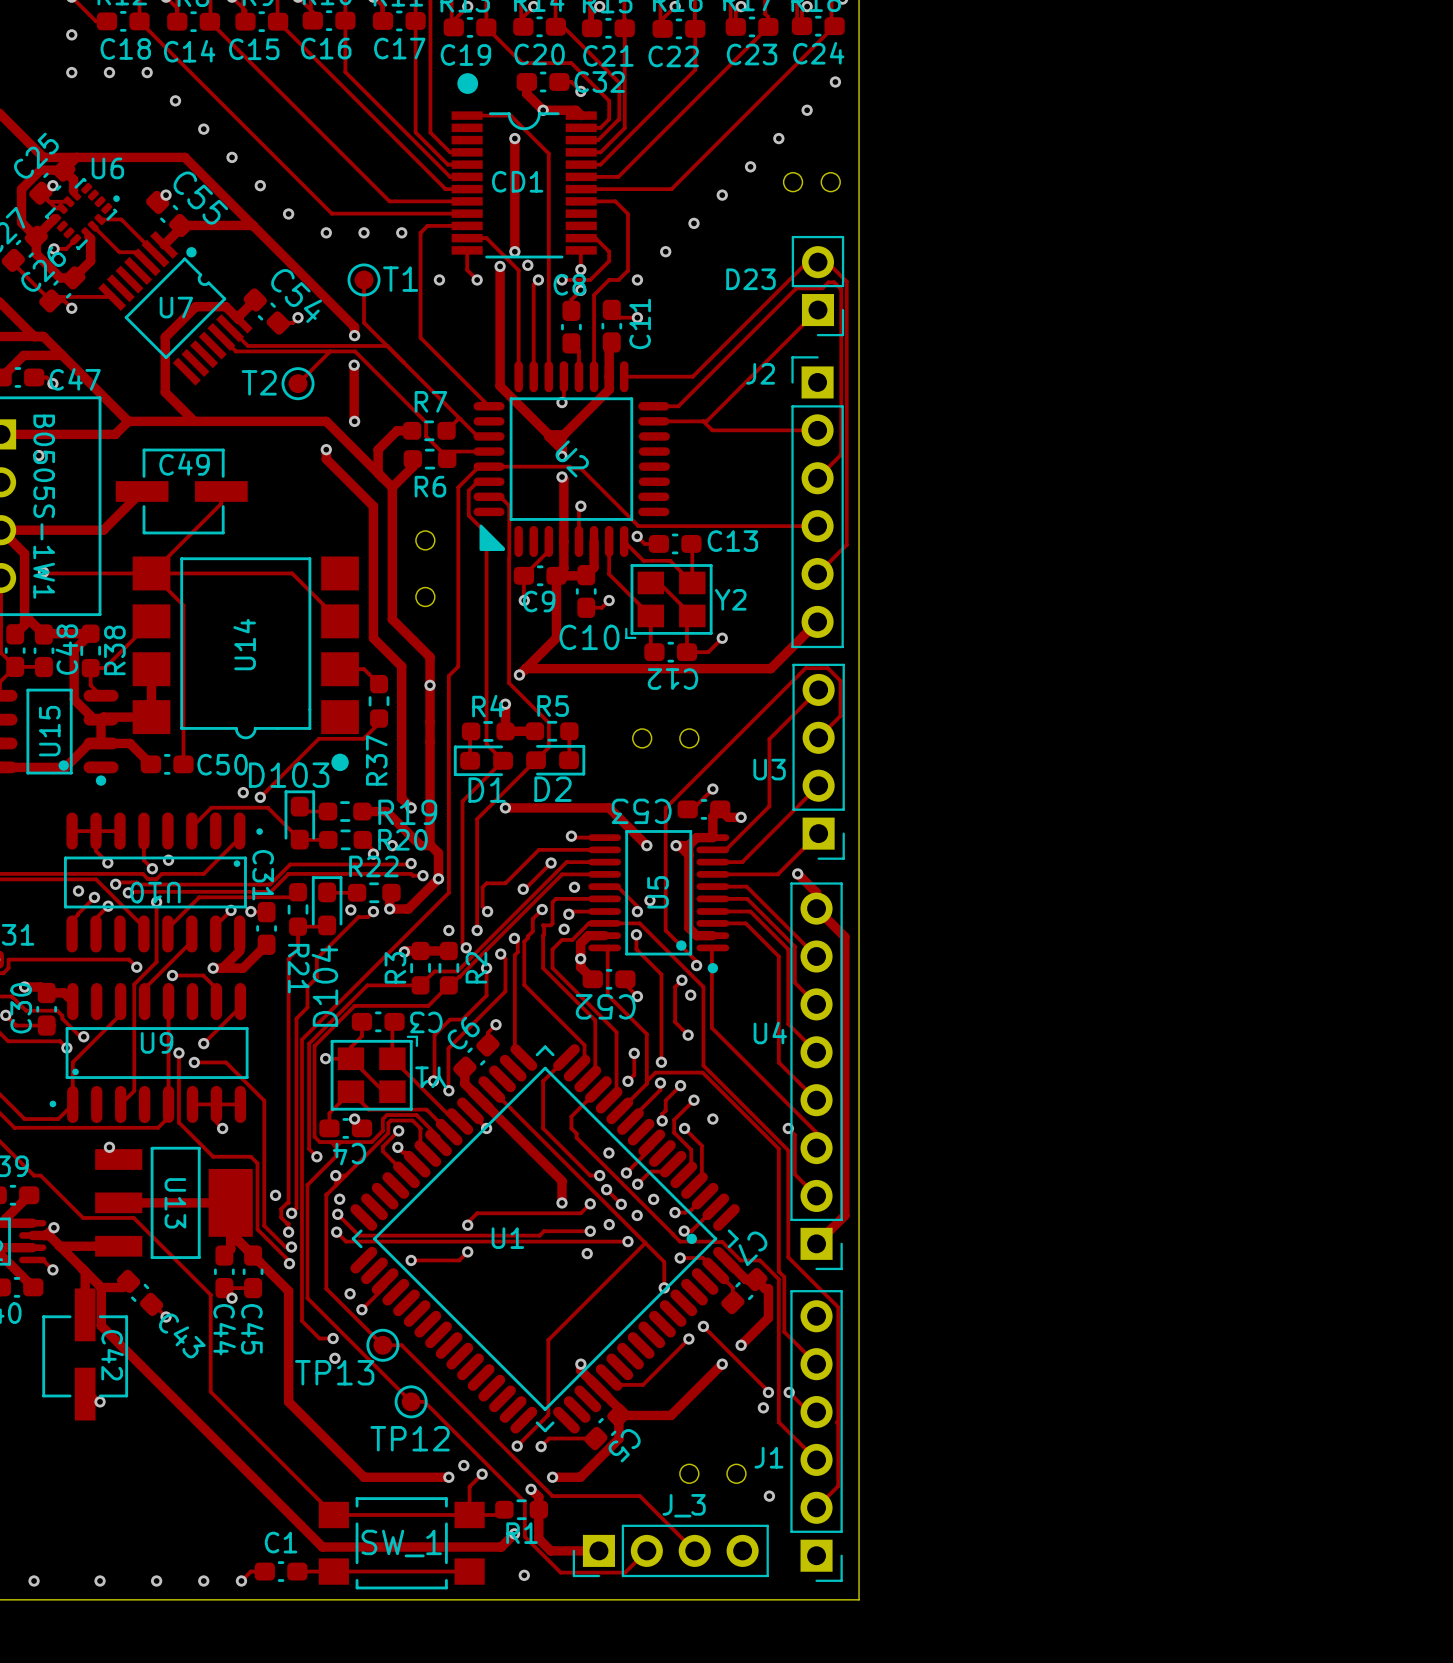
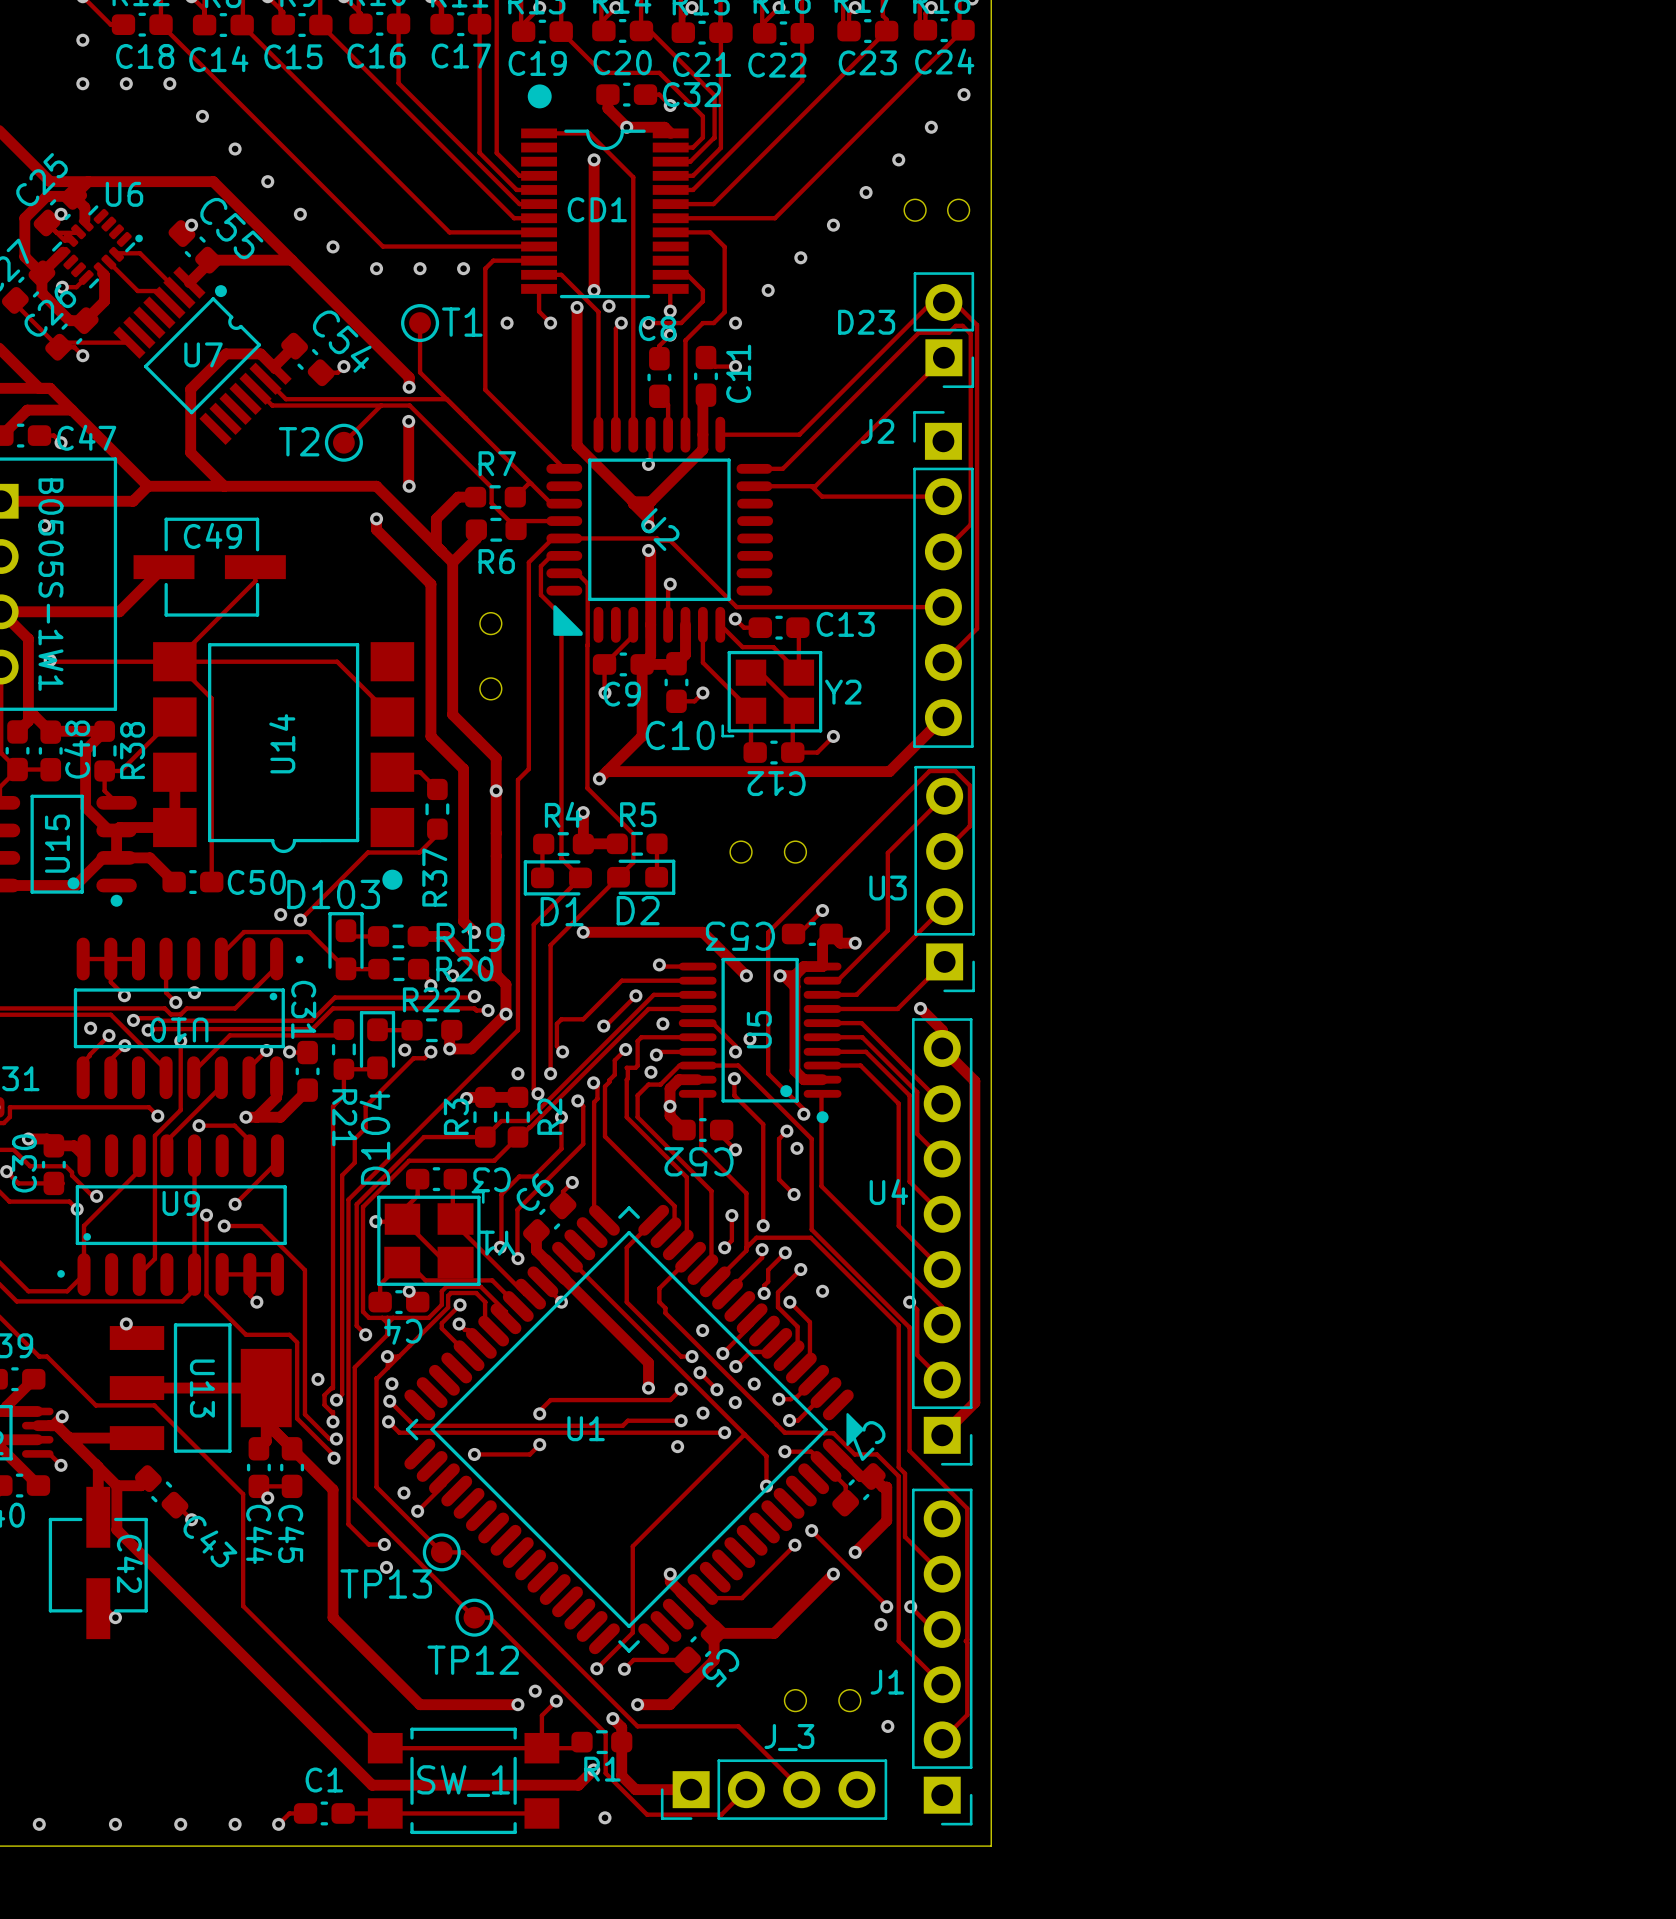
U6 footprint: [45, 177, 120, 251] -> [52, 205, 143, 289]
Y1 footprint: [330, 1035, 419, 1111] -> [377, 1190, 485, 1286]
U1 footprint: [350, 1044, 740, 1434] -> [404, 1204, 865, 1655]

